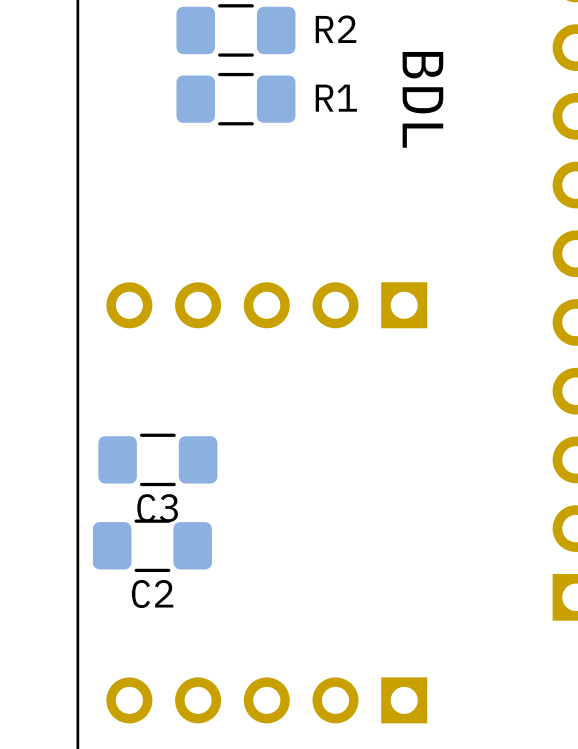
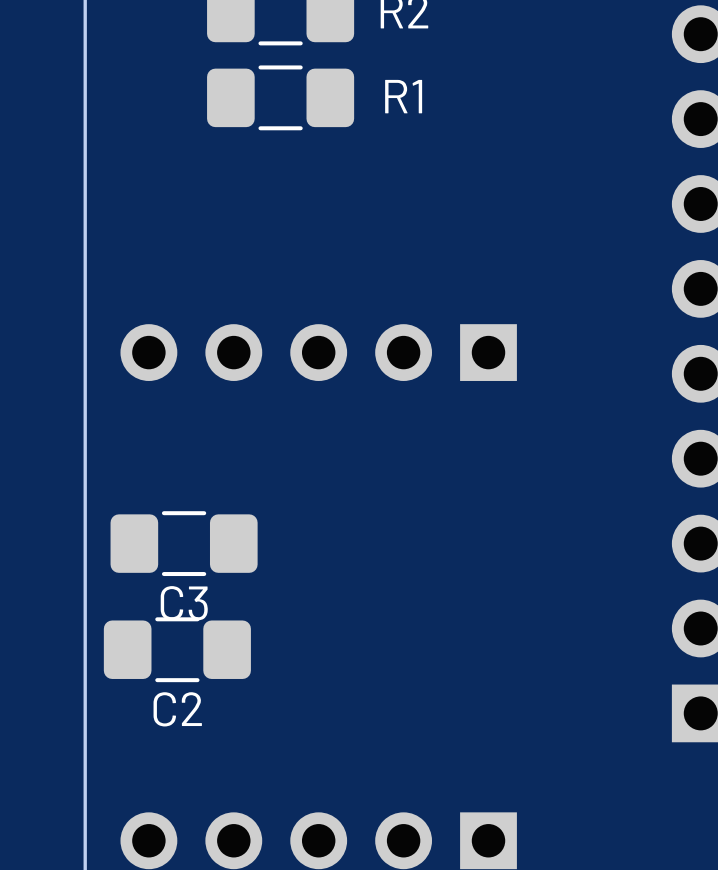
text: BDL (422, 99) -> none

